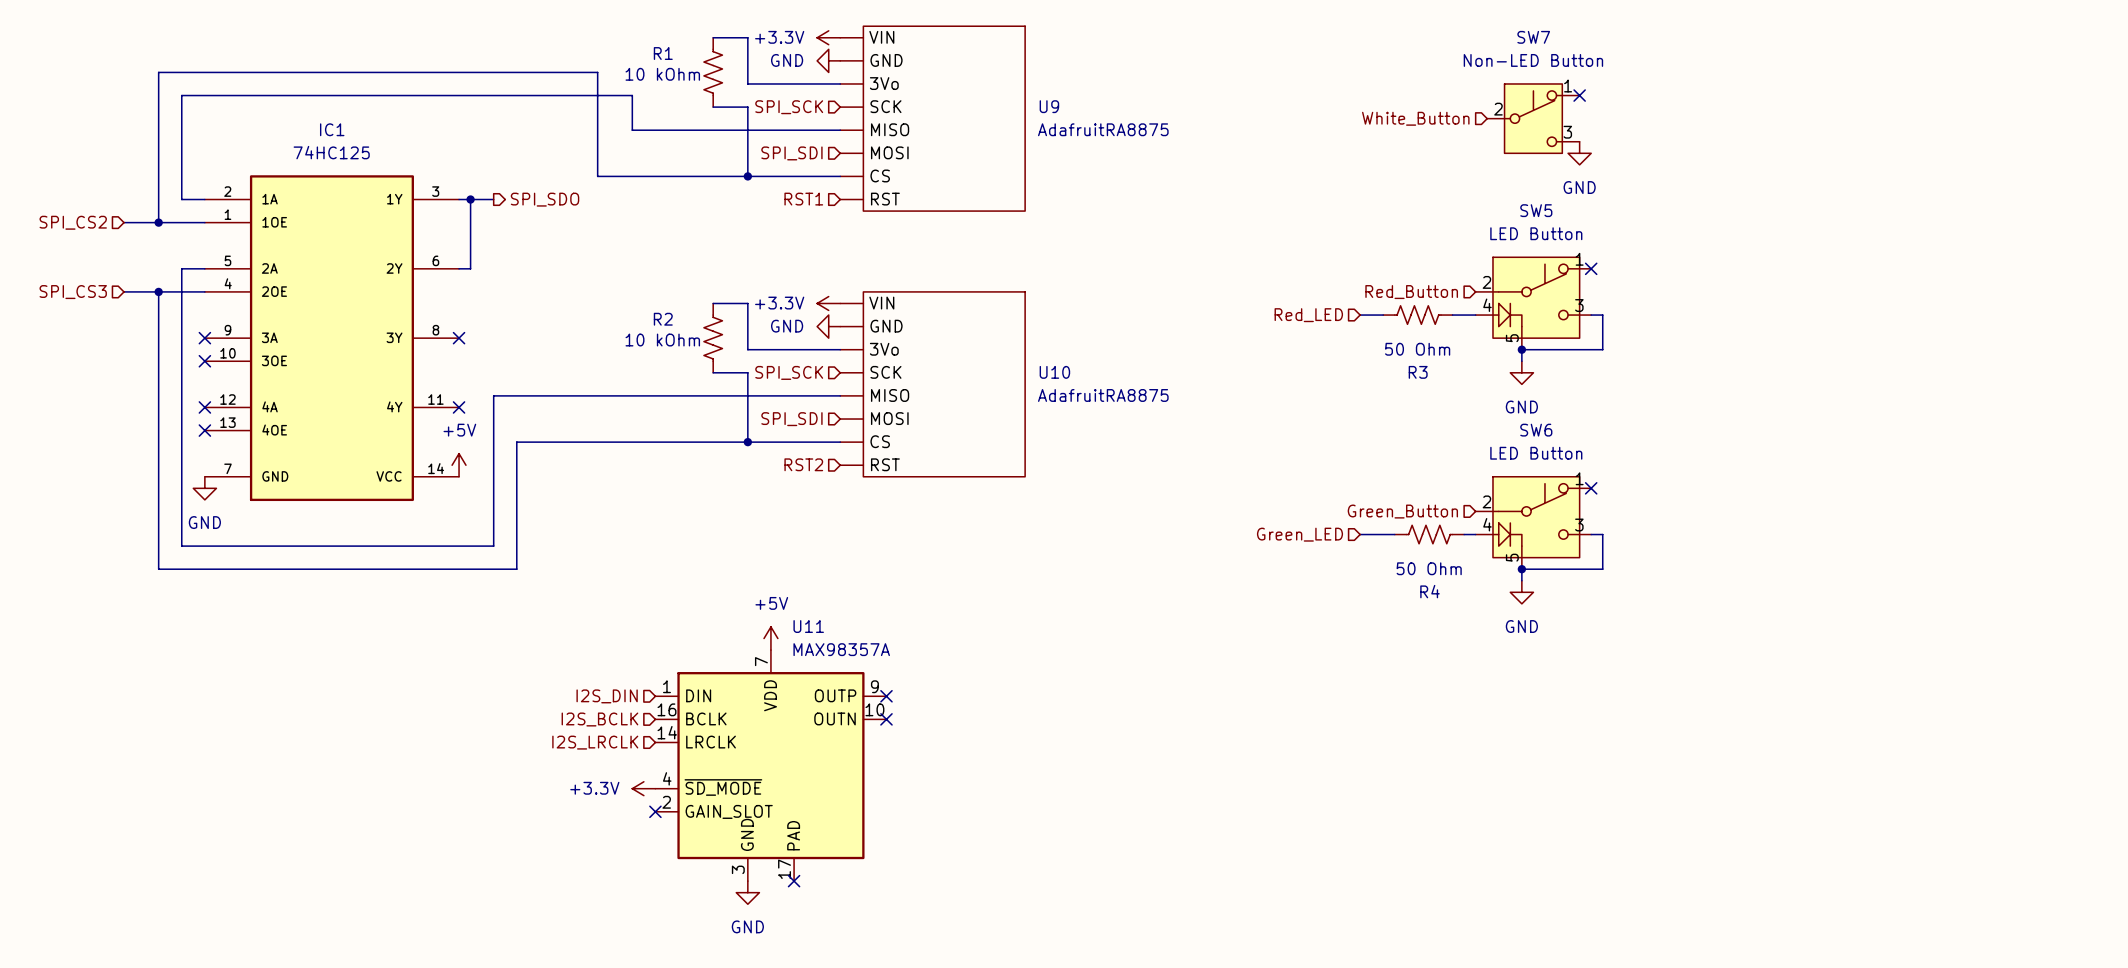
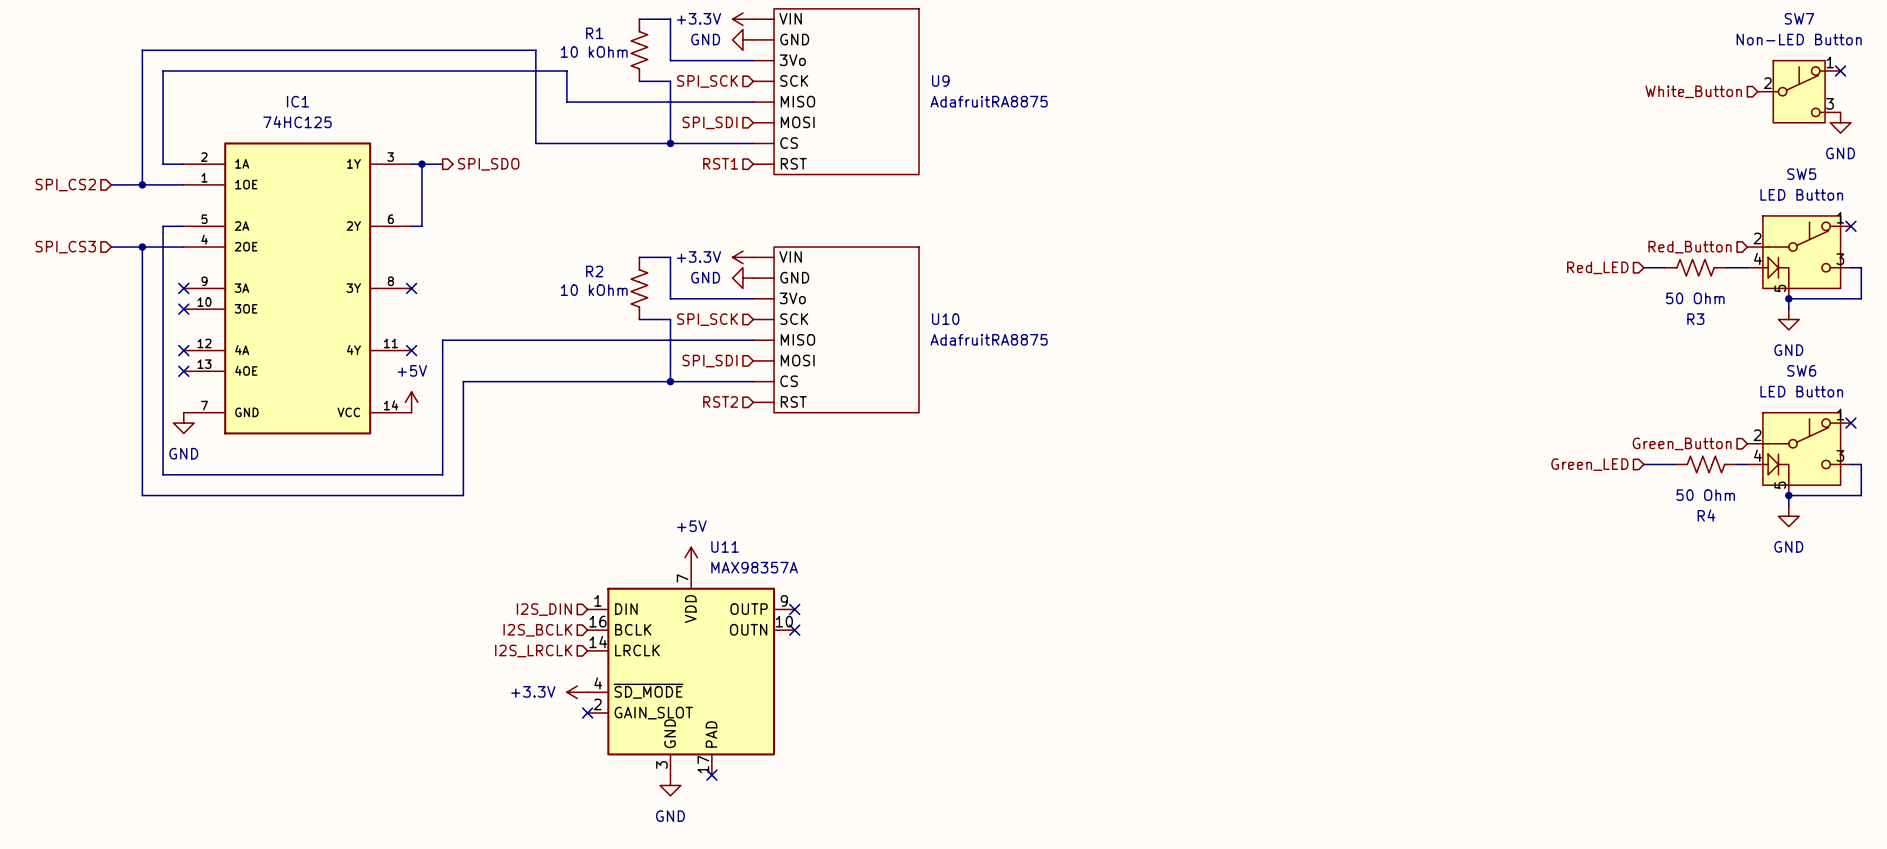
no-connect mark: (1579, 95) -> none
no-connect mark: none -> (1840, 70)
hierarchical label: White_Button (1415, 118) -> none
SW7 position: (1533, 118) -> (1799, 91)
hierarchical label: none -> White_Button (1693, 91)
power symbol: GND (1579, 153) -> none
power symbol: none -> GND (1840, 122)
no-connect mark: (1591, 268) -> none
no-connect mark: none -> (1850, 226)
hierarchical label: Red_Button (1411, 292) -> none
hierarchical label: none -> Red_Button (1690, 247)
SW5 position: (1533, 303) -> (1799, 257)
hierarchical label: Red_LED (1308, 315) -> none
wire: (1360, 315) (1383, 315) -> none
R3 position: (1417, 315) -> (1695, 267)
wire: (1452, 315) (1475, 315) -> none
wire: (1591, 315) (1602, 315) (1602, 349) (1521, 349) (1521, 361) -> none
hierarchical label: none -> Red_LED (1597, 267)
wire: none -> (1643, 267) (1664, 267)
wire: none -> (1726, 267) (1747, 267)
wire: none -> (1850, 267) (1861, 267) (1861, 298) (1788, 298) (1788, 309)
junction: (1521, 349) -> none
junction: none -> (1788, 298)
power symbol: GND (1521, 372) -> none
power symbol: none -> GND (1788, 319)
no-connect mark: (1591, 488) -> none
no-connect mark: none -> (1850, 423)
hierarchical label: Green_Button (1402, 511) -> none
hierarchical label: none -> Green_Button (1682, 443)
SW6 position: (1533, 522) -> (1799, 454)
hierarchical label: Green_LED (1299, 534) -> none
wire: (1360, 534) (1394, 534) -> none
R4 position: (1429, 534) -> (1705, 464)
wire: (1464, 534) (1475, 534) -> none
wire: (1591, 534) (1602, 534) (1602, 569) (1521, 569) (1521, 580) -> none
hierarchical label: none -> Green_LED (1589, 464)
wire: none -> (1643, 464) (1674, 464)
wire: none -> (1737, 464) (1747, 464)
wire: none -> (1850, 464) (1861, 464) (1861, 495) (1788, 495) (1788, 505)
junction: (1521, 569) -> none
junction: none -> (1788, 495)
power symbol: GND (1521, 592) -> none
power symbol: none -> GND (1788, 516)

